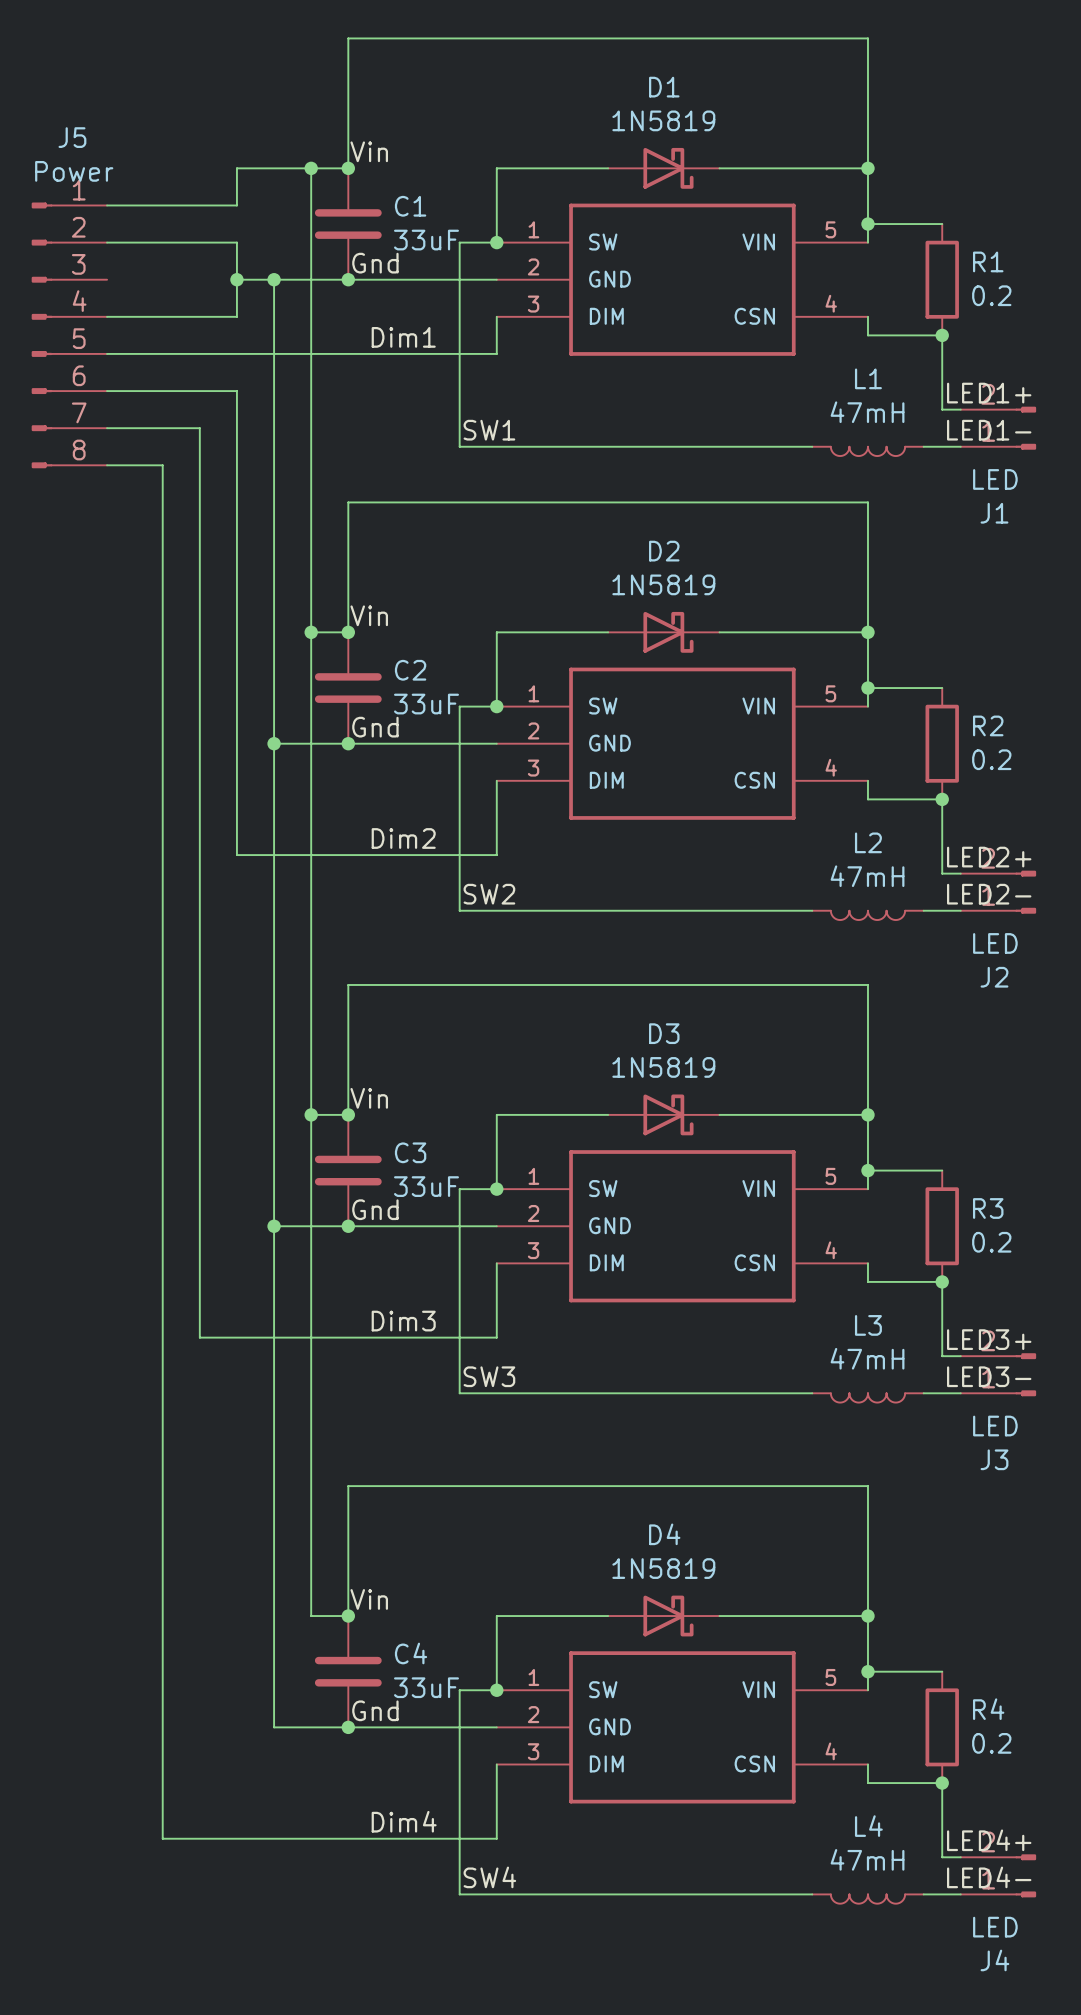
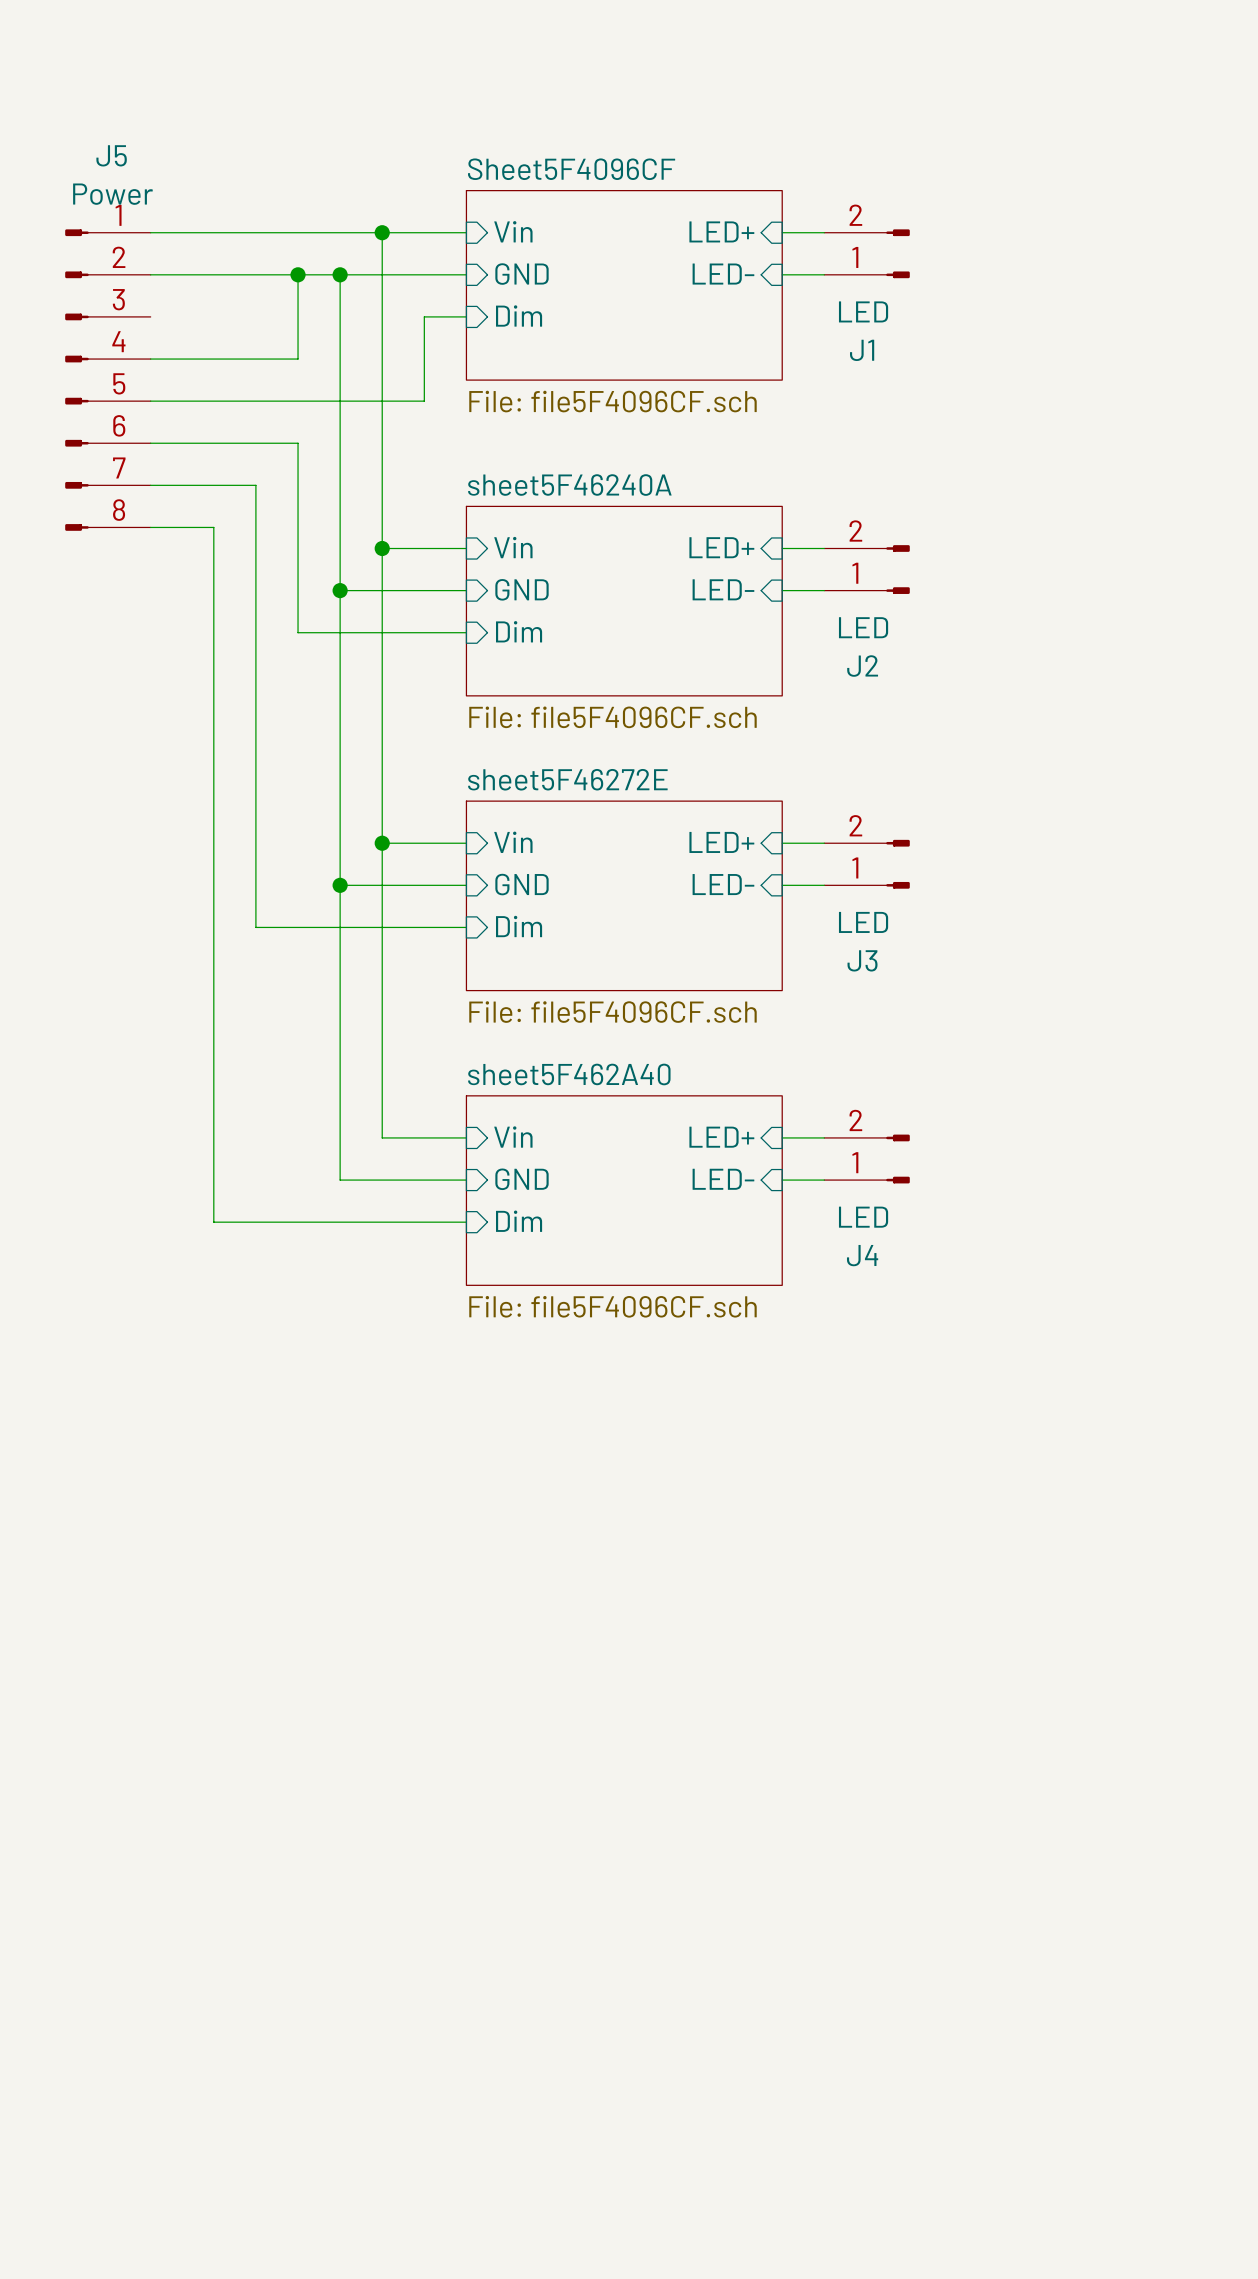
label: Vin (369, 151) -> none
wire: (311, 168) (311, 205) -> (340, 274) (340, 316)
junction: (311, 168) -> none
junction: (348, 168) -> none
wire: (608, 168) (496, 168) (496, 242) (459, 242) (459, 446) (812, 446) -> none
D1: 1N5819 (663, 168) -> none
wire: (719, 168) (867, 168) -> none
junction: (867, 168) -> none
sheet pin: none -> Vin (513, 231)
sheet pin: none -> LED+ (721, 231)
wire: (236, 205) (236, 168) (348, 168) (348, 38) (867, 38) (867, 242) -> (298, 232) (466, 232)
junction: none -> (382, 232)
C1: 33uF (348, 224) -> none
wire: (867, 224) (942, 224) -> none
junction: (867, 224) -> none
sheet pin: none -> GND (522, 274)
sheet pin: none -> LED- (723, 274)
wire: none -> (298, 274) (466, 274)
junction: none -> (298, 274)
junction: none -> (340, 274)
junction: (496, 242) -> none
wire: none -> (782, 274) (824, 274)
sheet Sheet5F4096CF: none -> File: file5F4096CF.sch (624, 285)
label: Gnd (375, 263) -> none
wire: (236, 279) (348, 279) -> (424, 401) (424, 316)
junction: (236, 279) -> none
junction: (274, 279) -> none
junction: (348, 279) -> none
wire: (385, 279) (496, 279) -> (340, 590) (466, 590)
sheet pin: none -> Dim (519, 315)
part: (682, 279) -> none
R1: 0.2 (942, 279) -> none
wire: (496, 316) (496, 353) (348, 353) -> none
wire: (867, 316) (867, 335) (942, 335) (942, 409) (960, 409) -> none
junction: (942, 335) -> none
label: Dim1 (403, 337) -> none
label: LED1+ (989, 393) -> none
J1 position: (998, 428) -> (867, 253)
label: SW1 (489, 430) -> none
label: LED1- (989, 430) -> none
wire: (923, 446) (960, 446) -> (782, 548) (824, 548)
L1: 47mH (867, 451) -> none
wire: none -> (382, 548) (466, 548)
junction: none -> (382, 548)
sheet pin: none -> Vin (513, 547)
sheet pin: none -> LED+ (721, 547)
junction: none -> (340, 590)
sheet pin: none -> GND (522, 589)
sheet pin: none -> LED- (723, 589)
wire: none -> (782, 590) (824, 590)
sheet sheet5F46240A: none -> File: file5F4096CF.sch (624, 601)
sheet pin: none -> Dim (519, 631)
wire: (236, 558) (236, 855) (496, 855) (496, 780) -> (298, 632) (466, 632)
label: Vin (369, 615) -> none
wire: (311, 632) (348, 632) (348, 502) (867, 502) (867, 706) -> none
junction: (311, 632) -> none
junction: (348, 632) -> none
wire: (608, 632) (496, 632) (496, 706) (459, 706) (459, 910) (812, 910) -> none
D2: 1N5819 (663, 632) -> none
wire: (719, 632) (867, 632) -> none
junction: (867, 632) -> none
C2: 33uF (348, 688) -> none
wire: (867, 688) (942, 688) -> none
junction: (867, 688) -> none
junction: (496, 706) -> none
label: Gnd (375, 727) -> none
wire: (274, 743) (311, 743) -> none
junction: (274, 743) -> none
junction: none -> (382, 843)
junction: (348, 743) -> none
wire: (385, 743) (496, 743) -> (340, 885) (466, 885)
sheet pin: none -> Vin (513, 842)
sheet pin: none -> LED+ (721, 842)
wire: none -> (782, 843) (824, 843)
part: (682, 743) -> none
R2: 0.2 (942, 743) -> none
junction: none -> (340, 885)
sheet pin: none -> GND (522, 884)
sheet pin: none -> LED- (723, 884)
wire: none -> (782, 885) (824, 885)
wire: (867, 780) (867, 799) (942, 799) (942, 873) (960, 873) -> none
sheet sheet5F46272E: none -> File: file5F4096CF.sch (624, 895)
junction: (942, 799) -> none
wire: (199, 817) (199, 1337) (496, 1337) (496, 1263) -> (255, 927) (466, 927)
sheet pin: none -> Dim (519, 926)
label: Dim2 (403, 838) -> none
label: LED2+ (989, 857) -> none
J2 position: (998, 892) -> (867, 569)
label: SW2 (489, 894) -> none
label: LED2- (989, 894) -> none
wire: (923, 910) (960, 910) -> (782, 1137) (824, 1137)
L2: 47mH (867, 915) -> none
sheet pin: none -> Vin (513, 1137)
sheet pin: none -> LED+ (721, 1137)
wire: (311, 1003) (311, 1616) (348, 1616) (348, 1486) (867, 1486) (867, 1690) -> (382, 1137) (466, 1137)
sheet pin: none -> GND (522, 1179)
sheet pin: none -> LED- (723, 1179)
wire: (274, 1040) (274, 1727) (496, 1727) -> (340, 1180) (466, 1180)
wire: none -> (782, 1180) (824, 1180)
sheet sheet5F462A40: none -> File: file5F4096CF.sch (624, 1190)
wire: (162, 1077) (162, 1838) (496, 1838) (496, 1764) -> (213, 1222) (466, 1222)
sheet pin: none -> Dim (519, 1221)
label: Vin (369, 1098) -> none
wire: (311, 1114) (348, 1114) (348, 984) (867, 984) (867, 1189) -> none
junction: (311, 1114) -> none
junction: (348, 1114) -> none
wire: (608, 1114) (496, 1114) (496, 1189) (459, 1189) (459, 1393) (812, 1393) -> none
D3: 1N5819 (663, 1114) -> none
wire: (719, 1114) (867, 1114) -> none
junction: (867, 1114) -> none
C3: 33uF (348, 1170) -> none
wire: (867, 1170) (942, 1170) -> none
junction: (867, 1170) -> none
junction: (496, 1189) -> none
label: Gnd (375, 1209) -> none
wire: (274, 1226) (496, 1226) -> none
junction: (274, 1226) -> none
junction: (348, 1226) -> none
part: (682, 1226) -> none
R3: 0.2 (942, 1226) -> none
wire: (867, 1263) (867, 1281) (942, 1281) (942, 1356) (960, 1356) -> none
junction: (942, 1281) -> none
label: Dim3 (403, 1321) -> none
label: LED3+ (989, 1339) -> none
J3 position: (998, 1374) -> (867, 864)
label: SW3 (489, 1376) -> none
label: LED3- (989, 1376) -> none
wire: (923, 1393) (960, 1393) -> none
L3: 47mH (867, 1397) -> none
label: Vin (369, 1599) -> none
junction: (348, 1616) -> none
wire: (608, 1616) (496, 1616) (496, 1690) (459, 1690) (459, 1894) (812, 1894) -> none
D4: 1N5819 (663, 1616) -> none
wire: (719, 1616) (867, 1616) -> none
junction: (867, 1616) -> none
C4: 33uF (348, 1671) -> none
wire: (867, 1671) (942, 1671) -> none
junction: (867, 1671) -> none
junction: (496, 1690) -> none
label: Gnd (375, 1710) -> none
junction: (348, 1727) -> none
part: (682, 1727) -> none
R4: 0.2 (942, 1727) -> none
wire: (867, 1764) (867, 1783) (942, 1783) (942, 1857) (960, 1857) -> none
junction: (942, 1783) -> none
label: Dim4 (404, 1821) -> none
label: LED4+ (989, 1840) -> none
J4 position: (998, 1875) -> (867, 1159)
label: SW4 (489, 1877) -> none
label: LED4- (989, 1877) -> none
wire: (923, 1894) (960, 1894) -> none
L4: 47mH (867, 1899) -> none

